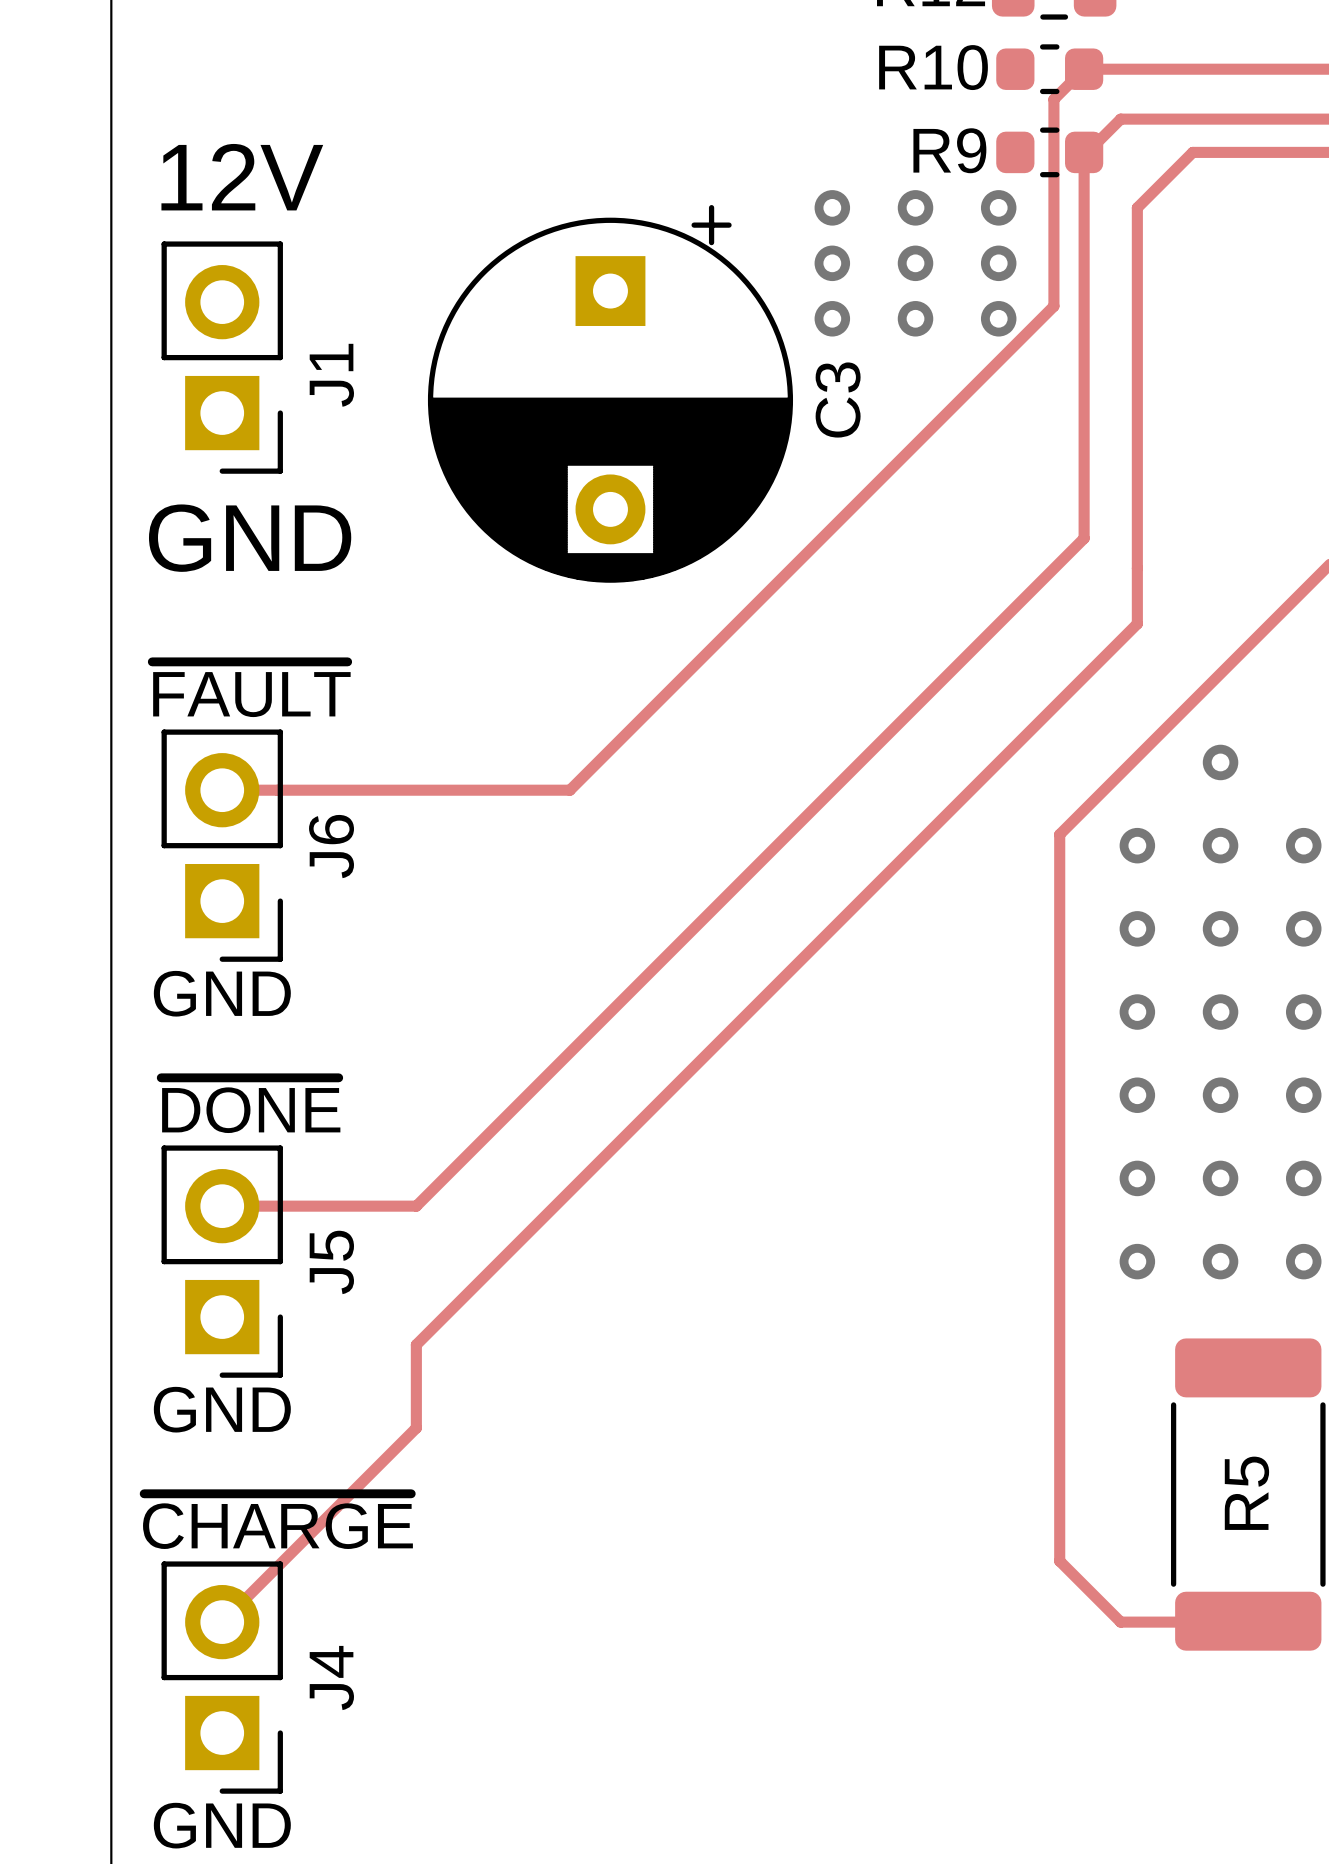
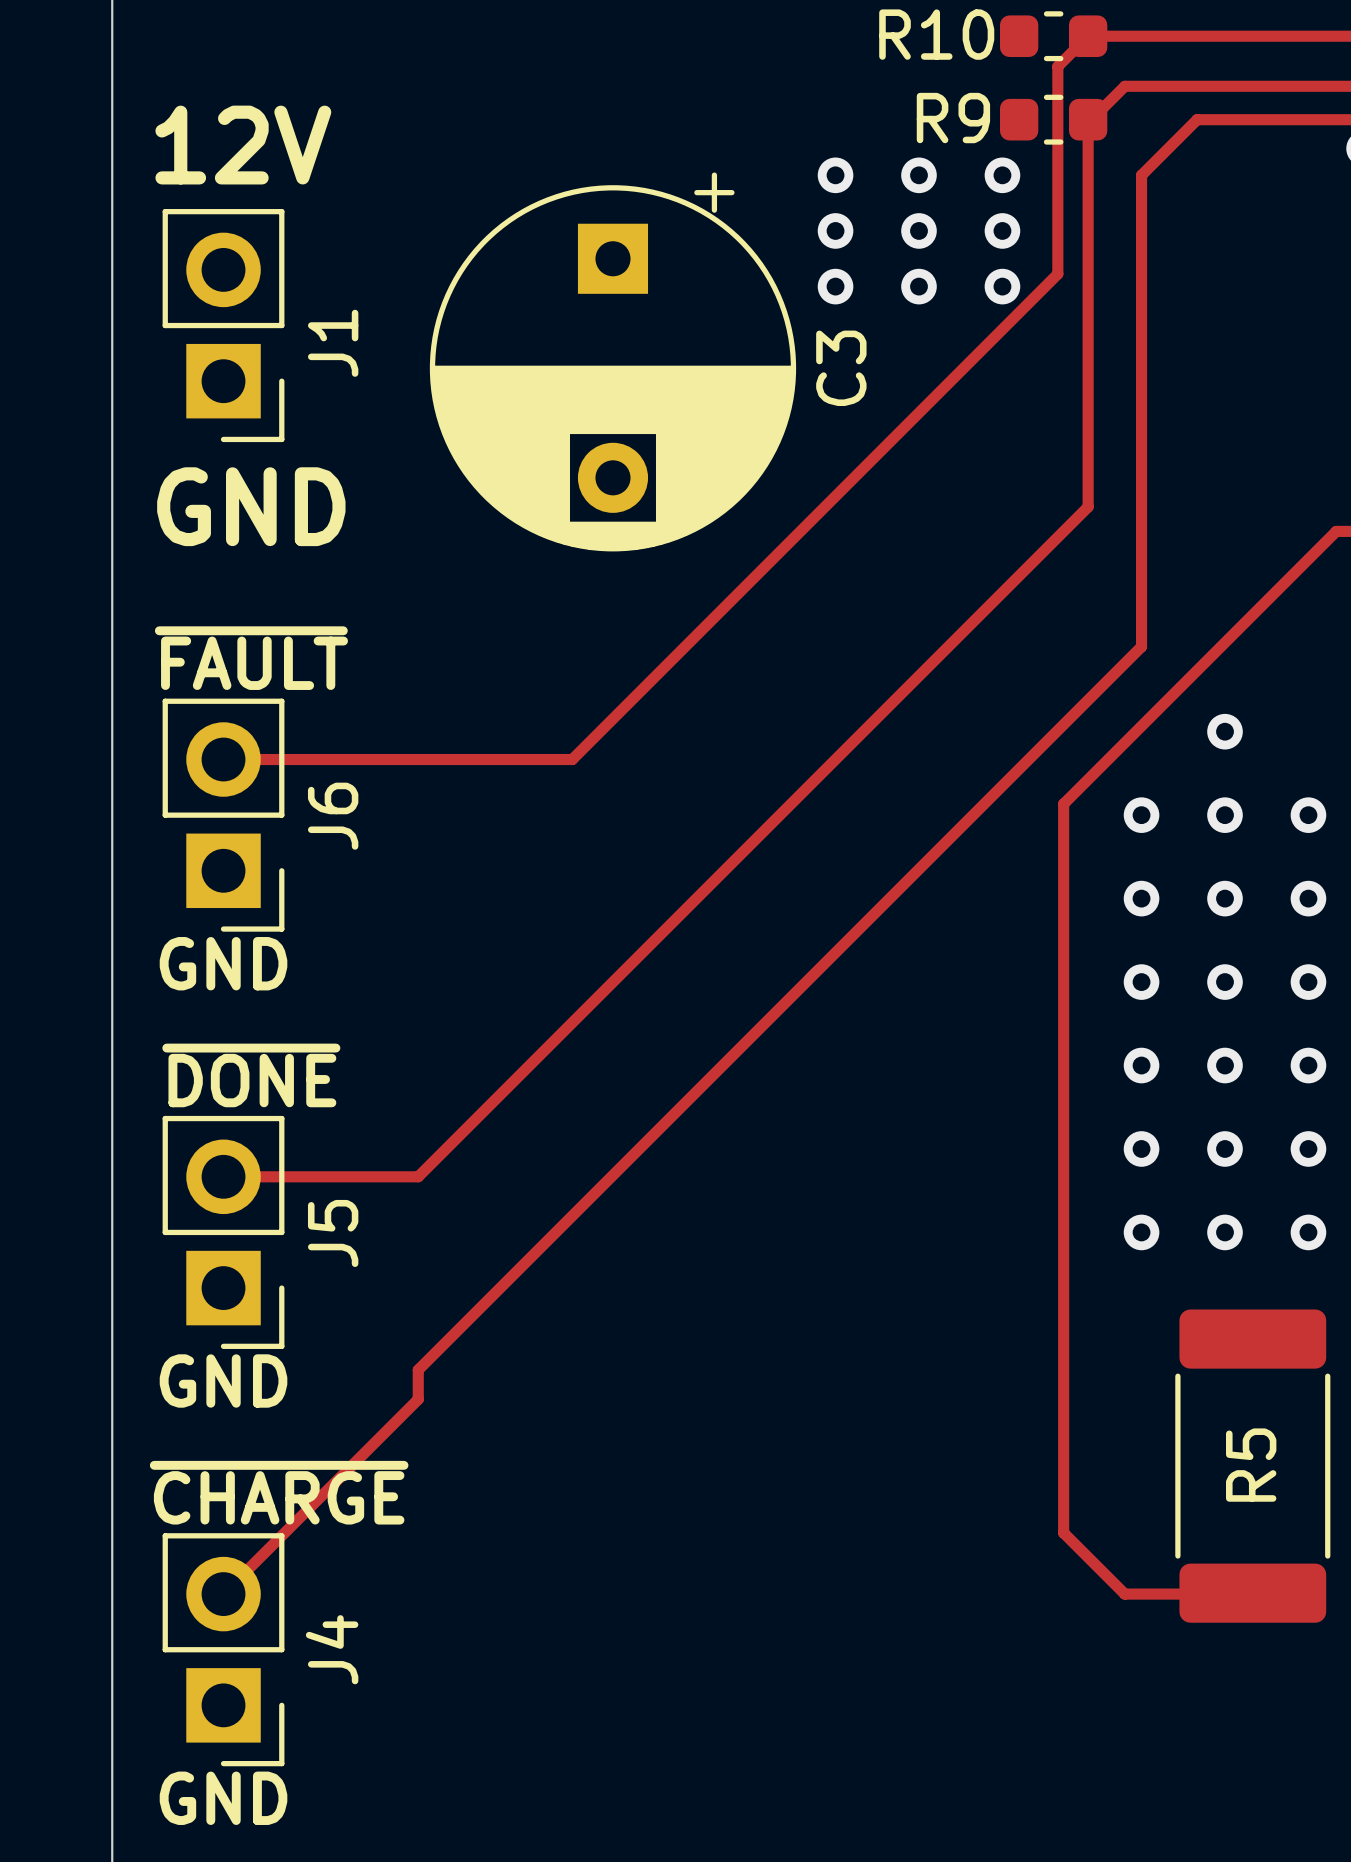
track: (1137, 623) (416, 1344) (416, 1398) -> (1141, 592) (1141, 646) (418, 1370)

